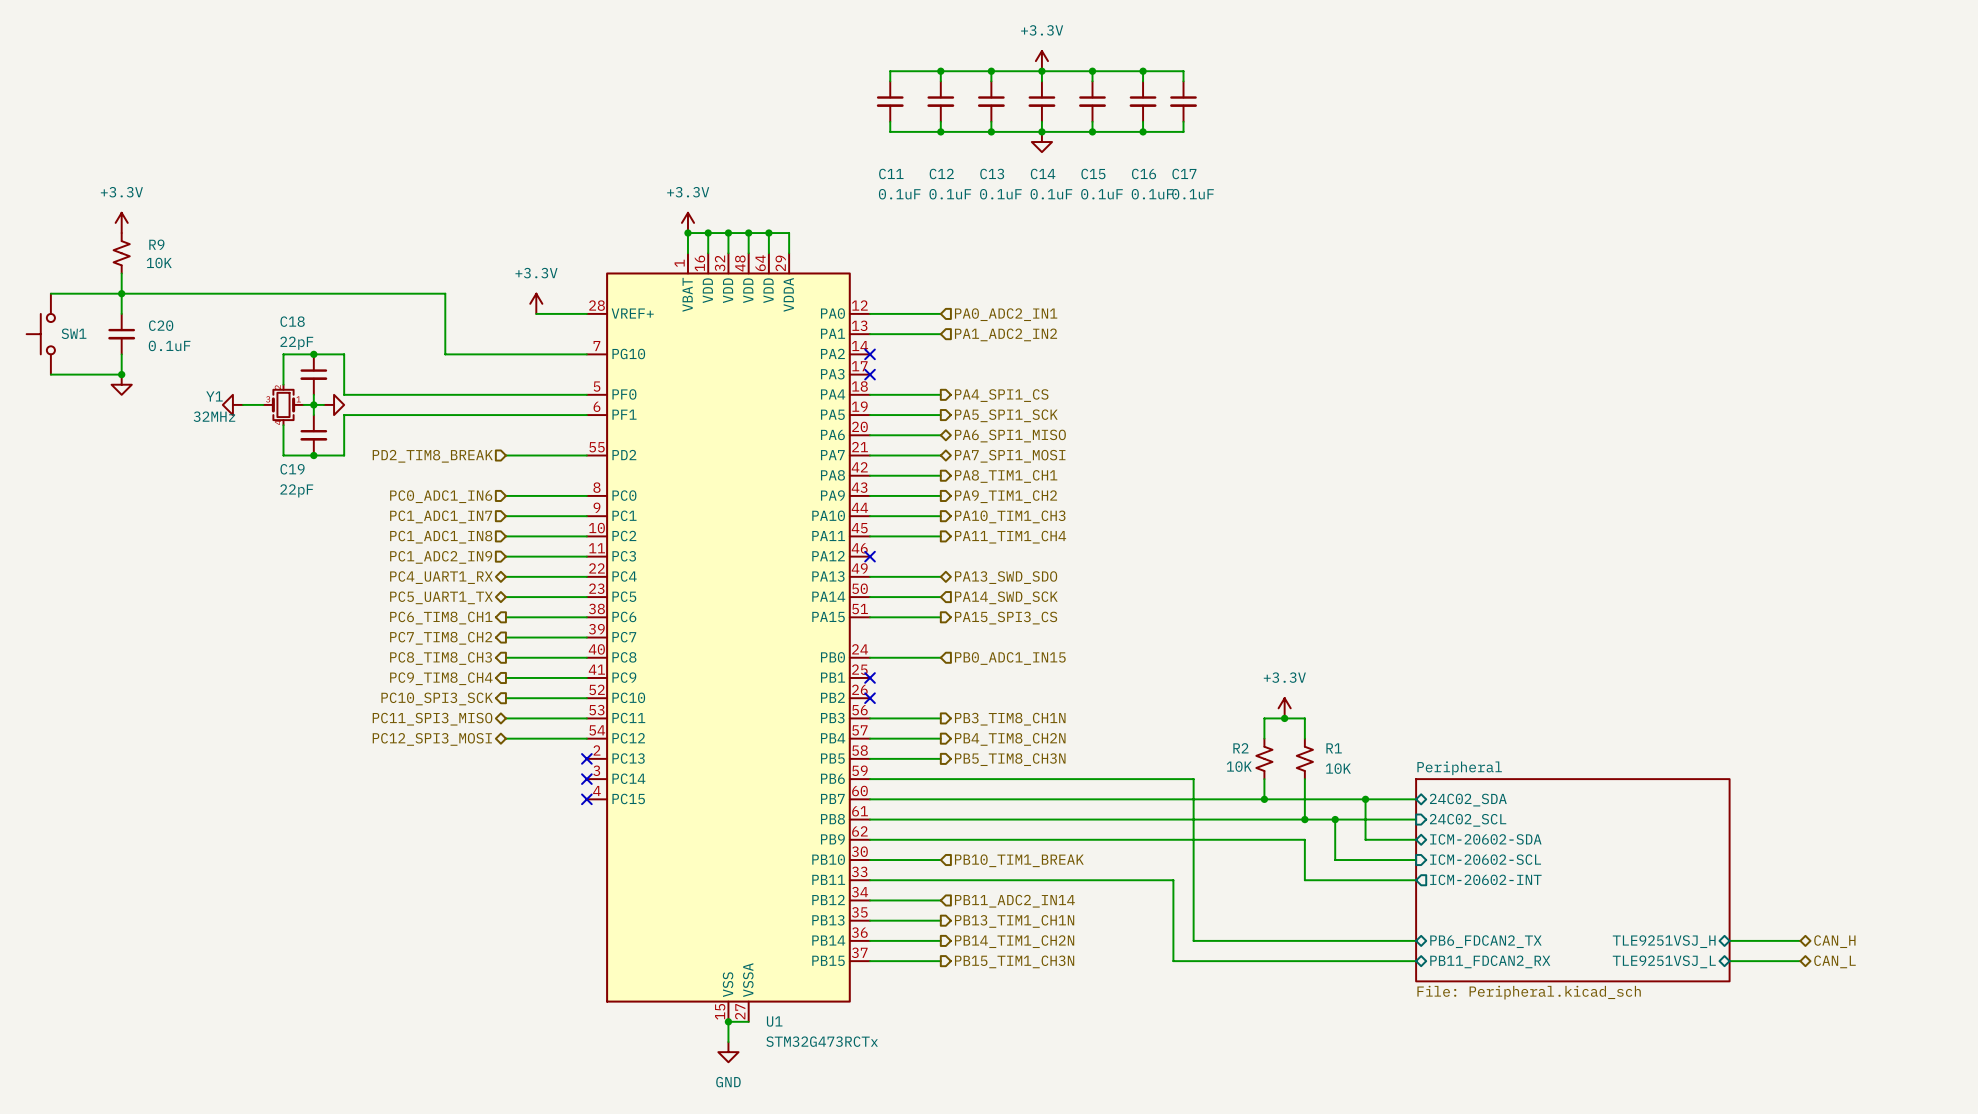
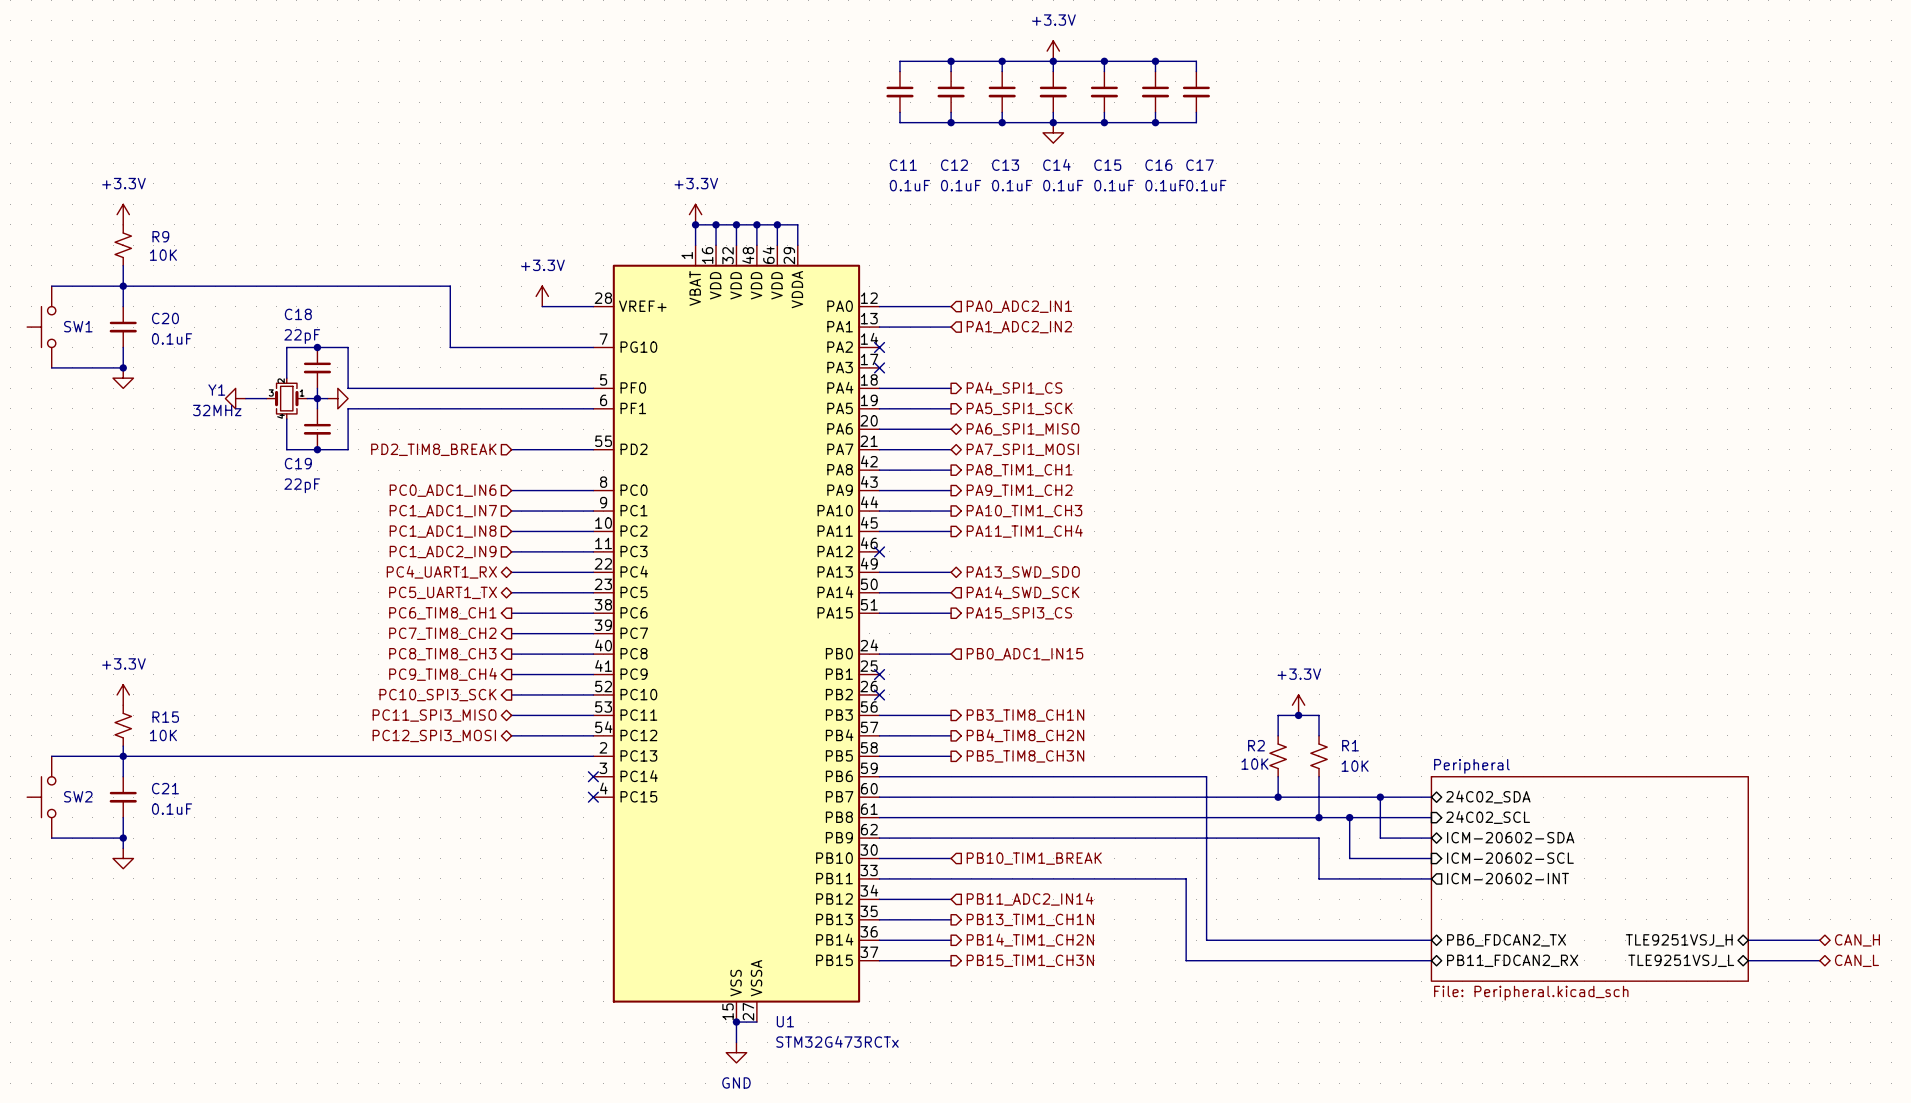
power symbol: none -> +3.3V (123, 694)
R15: none -> 10K (123, 725)
wire: none -> (123, 746) (123, 776)
wire: none -> (51, 756) (593, 756)
junction: none -> (123, 756)
no-connect mark: (586, 758) -> none
SW2: none -> (41, 797)
C21: none -> 0.1uF (123, 797)
wire: none -> (123, 817) (123, 848)
wire: none -> (51, 838) (123, 838)
junction: none -> (123, 838)
power symbol: none -> (123, 858)

